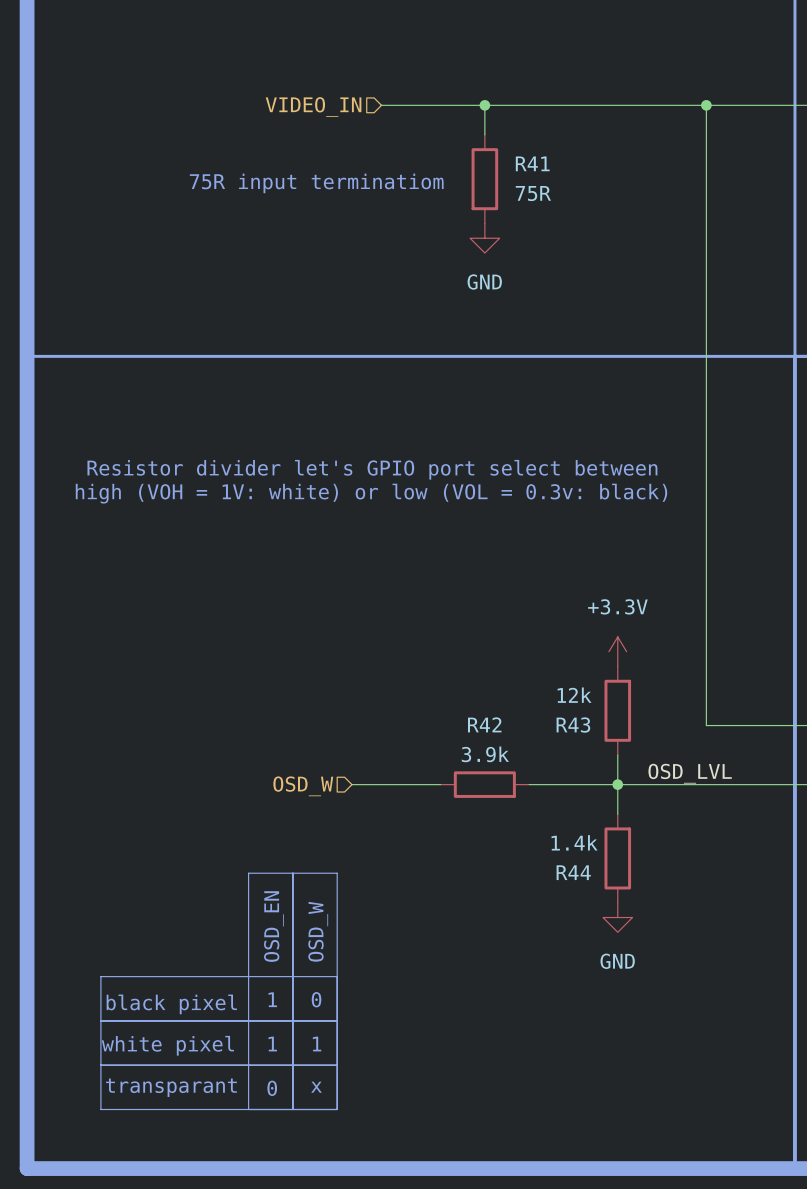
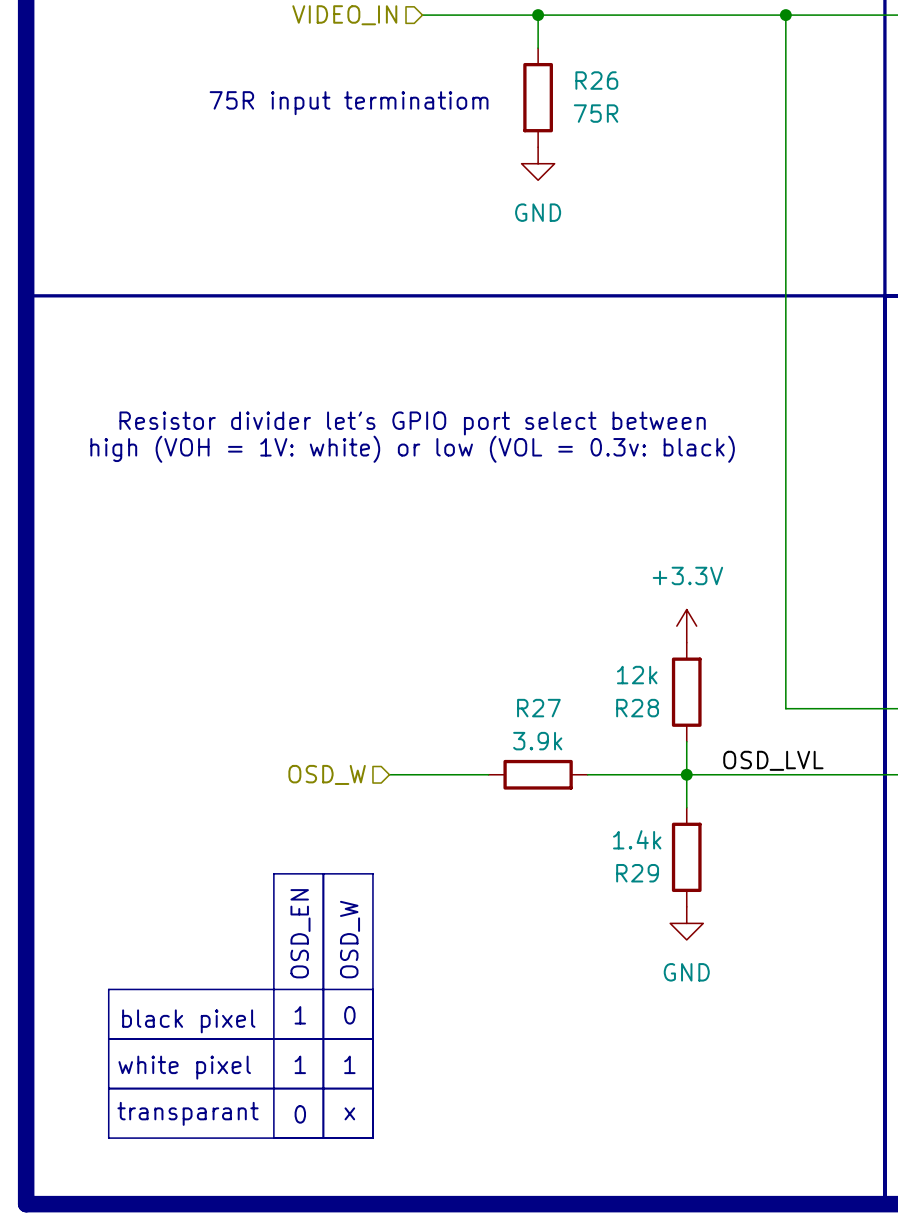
R41 name: R41 (532, 163) -> R26 (596, 80)
R42 name: R42 (484, 724) -> R27 (538, 708)
R43 name: R43 (573, 725) -> R28 (637, 708)
R44 name: R44 (573, 872) -> R29 (637, 873)

